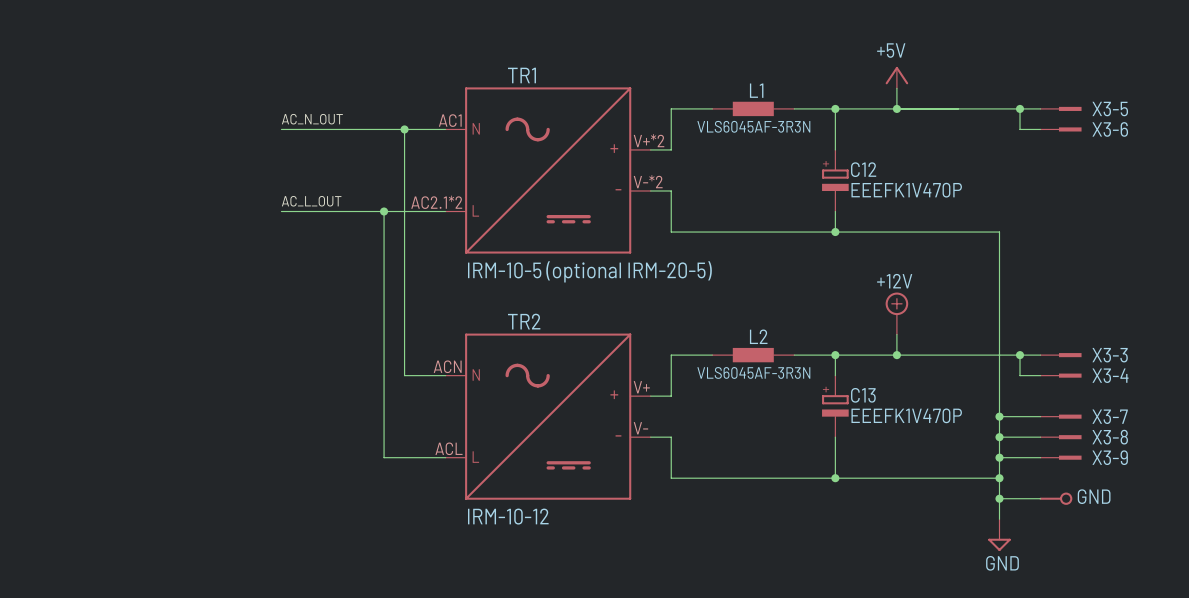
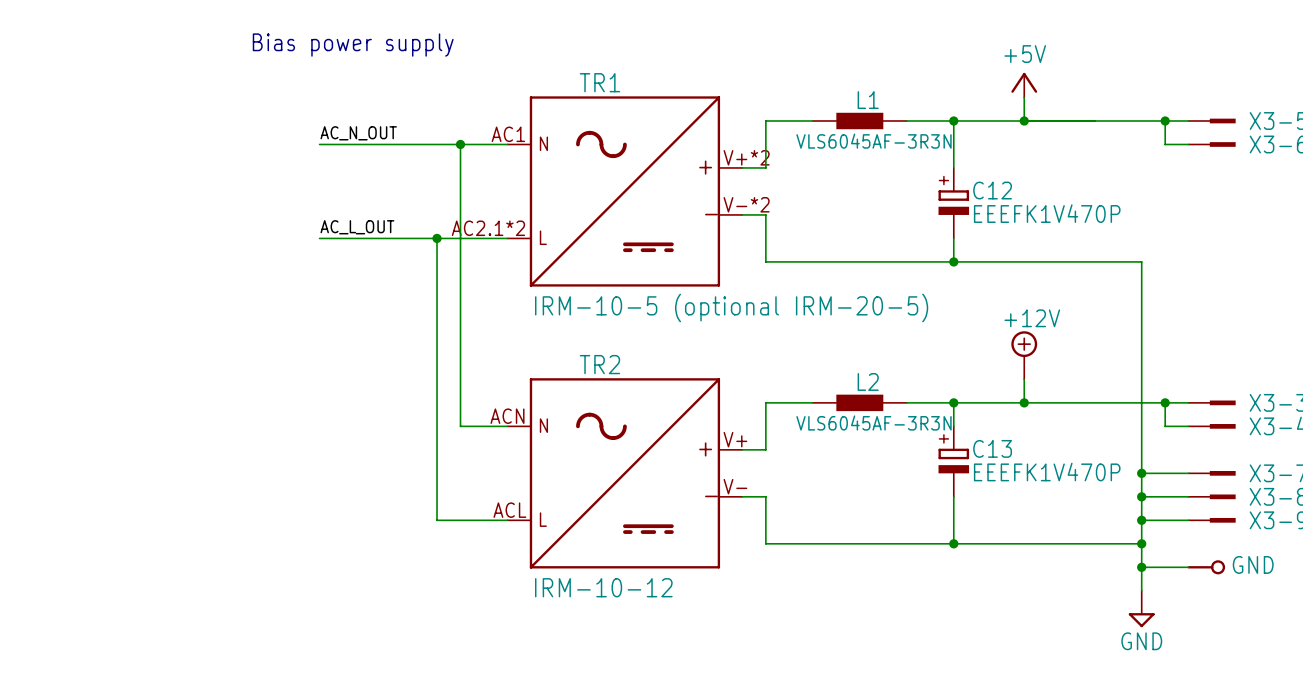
text: none -> Bias power supply (353, 45)

